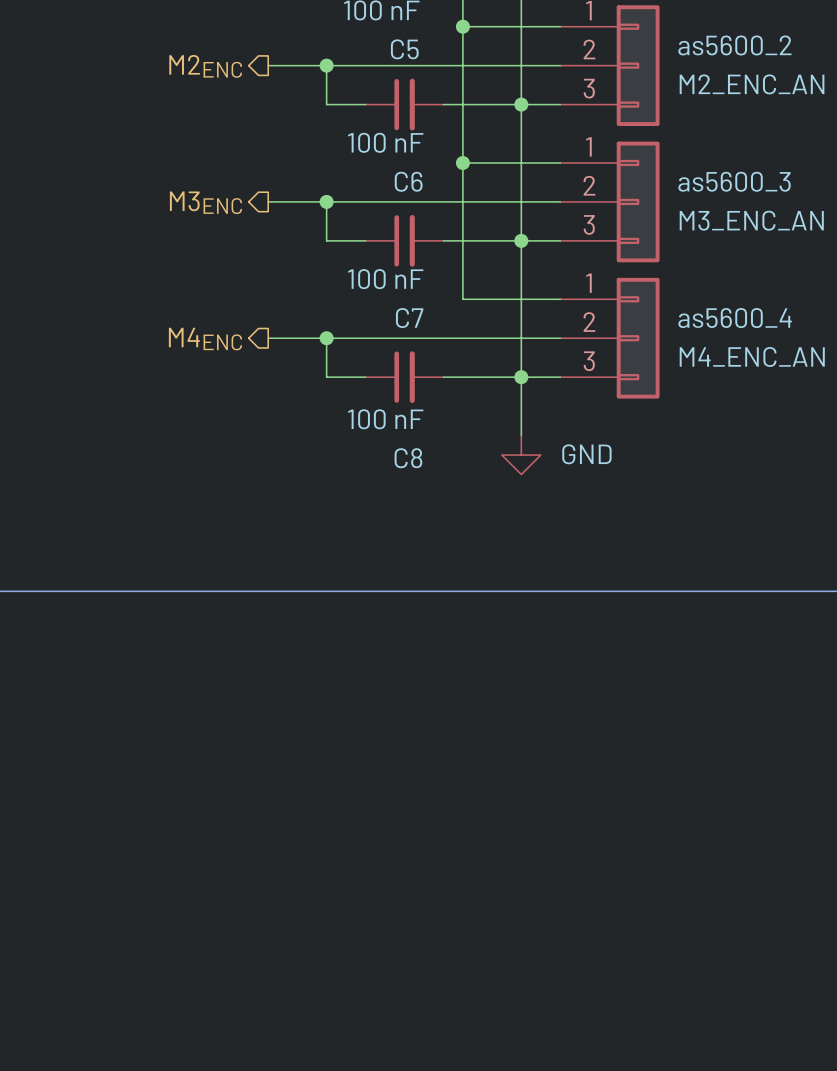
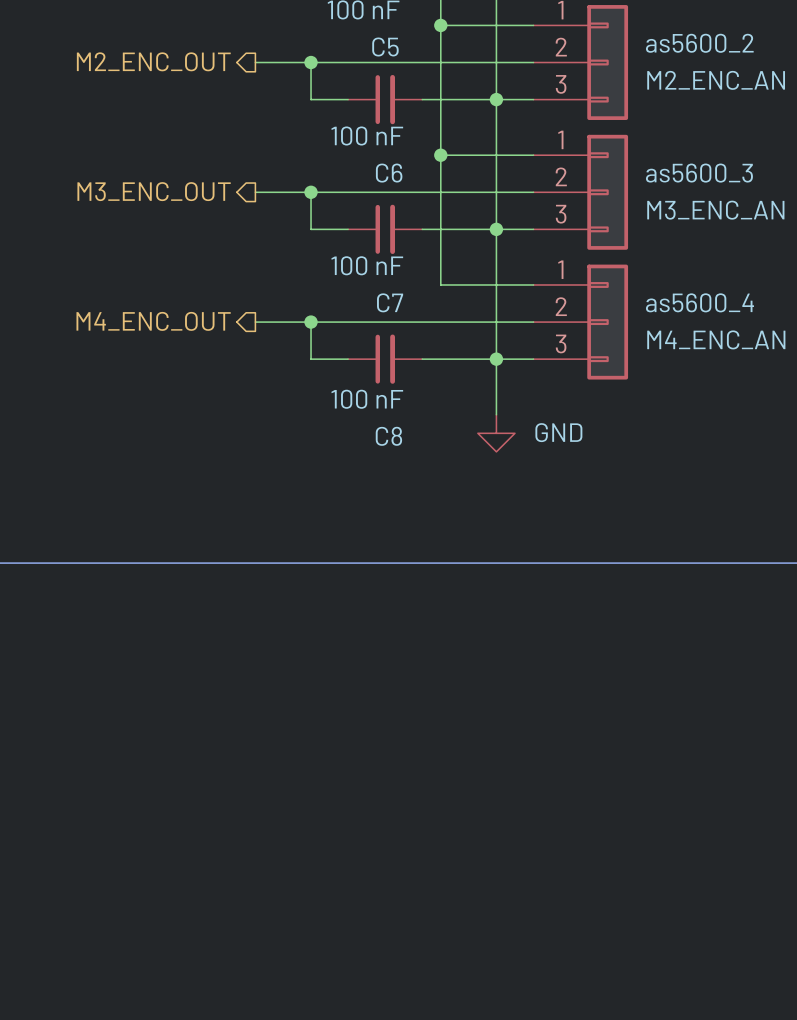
hierarchical label: M2ENC (205, 66) -> M2_ENC_OUT (153, 61)
hierarchical label: M3ENC (205, 202) -> M3_ENC_OUT (154, 191)
hierarchical label: M4ENC (205, 339) -> M4_ENC_OUT (153, 321)

